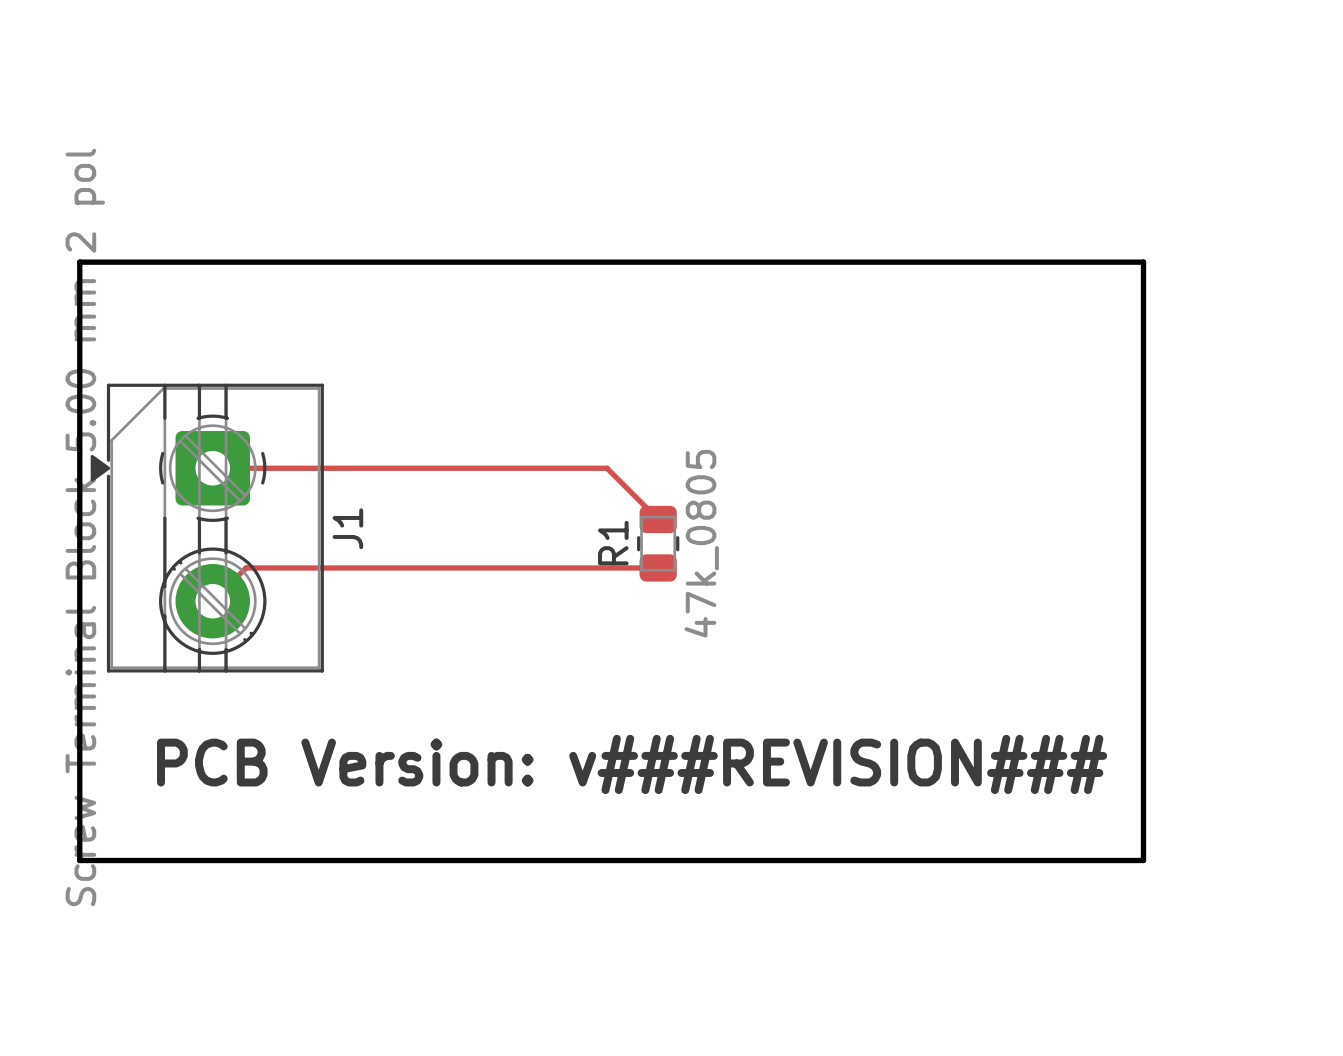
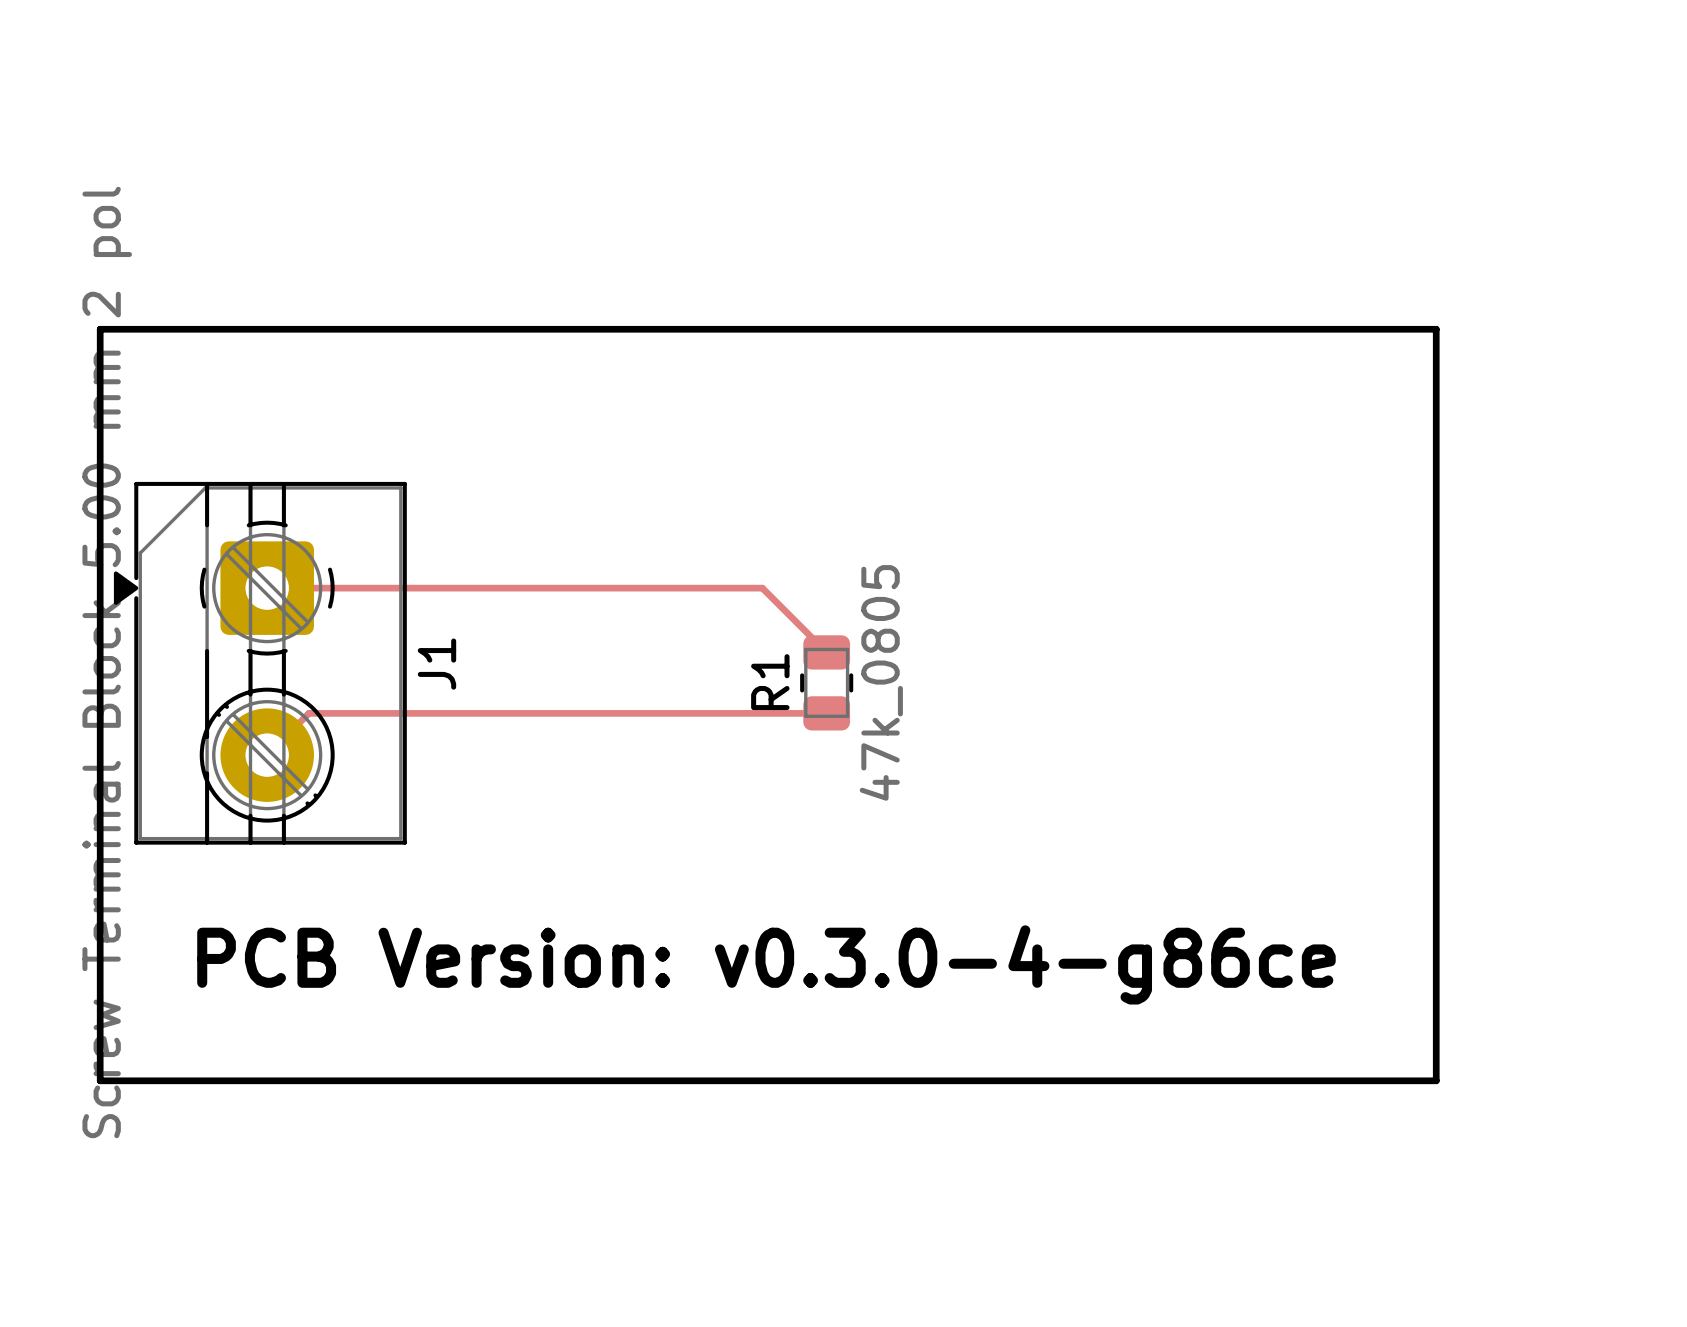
text: PCB Version: v###REVISION### (632, 764) -> PCB Version: v0.3.0-4-g86ce (766, 964)

